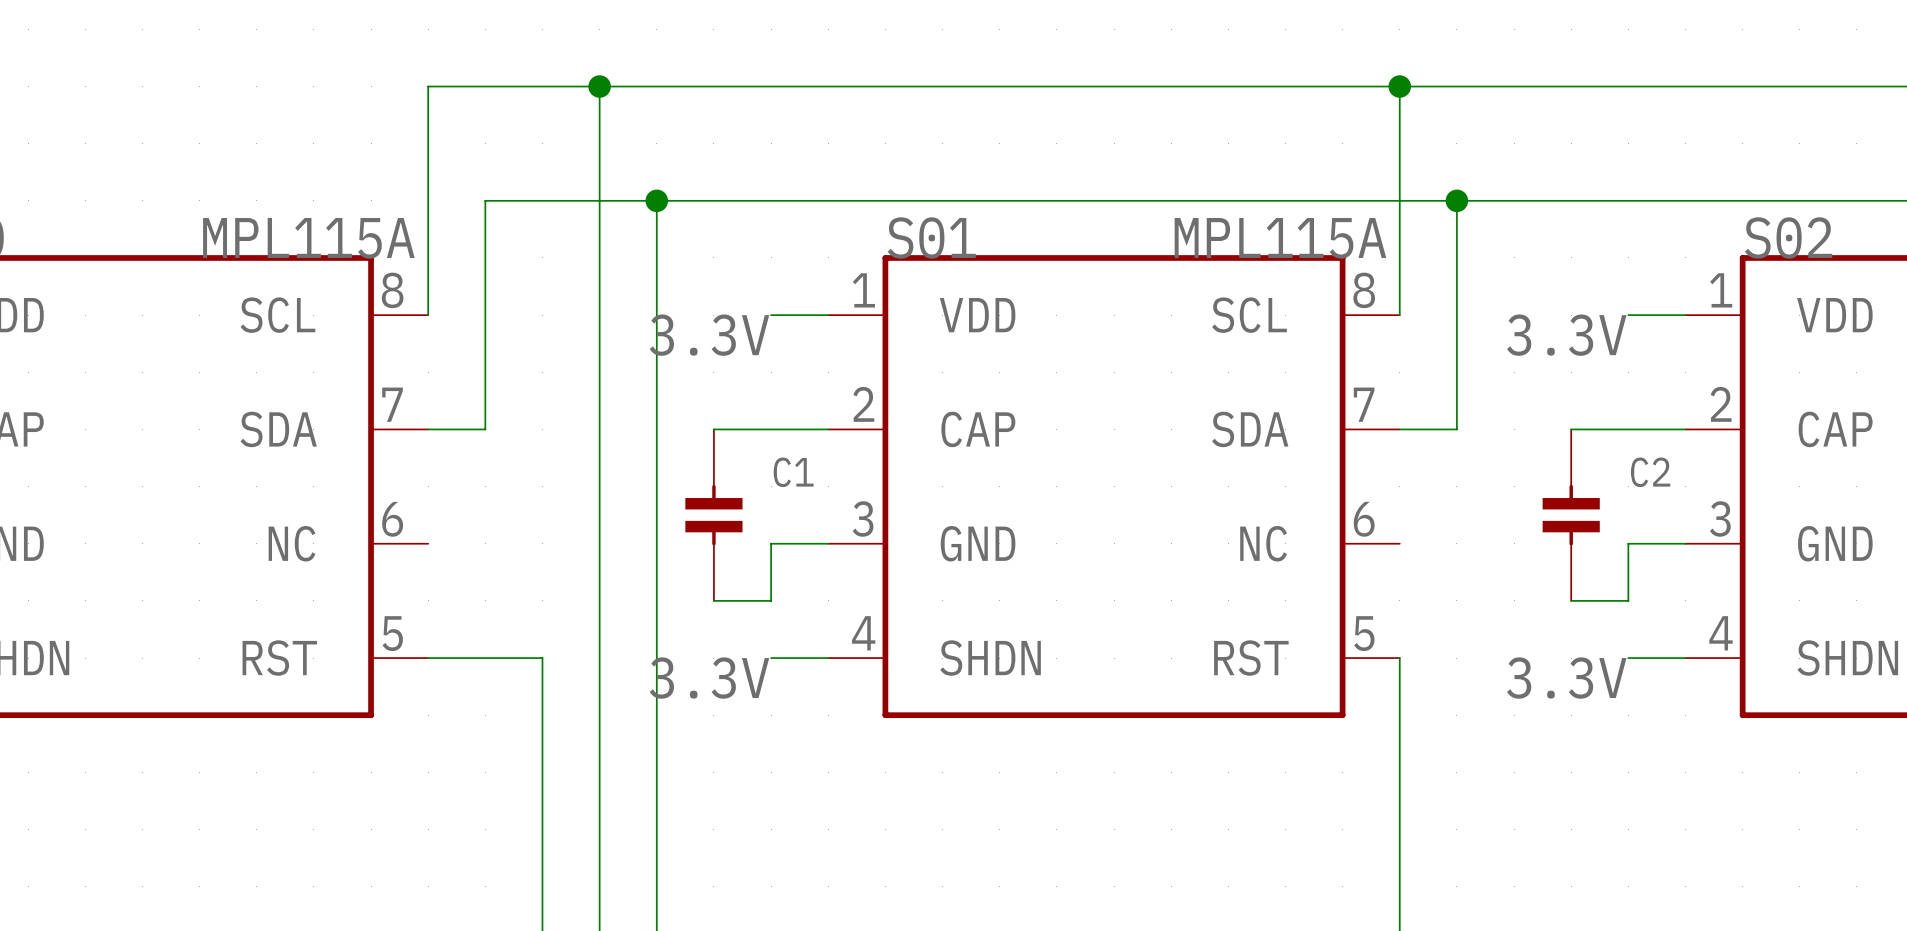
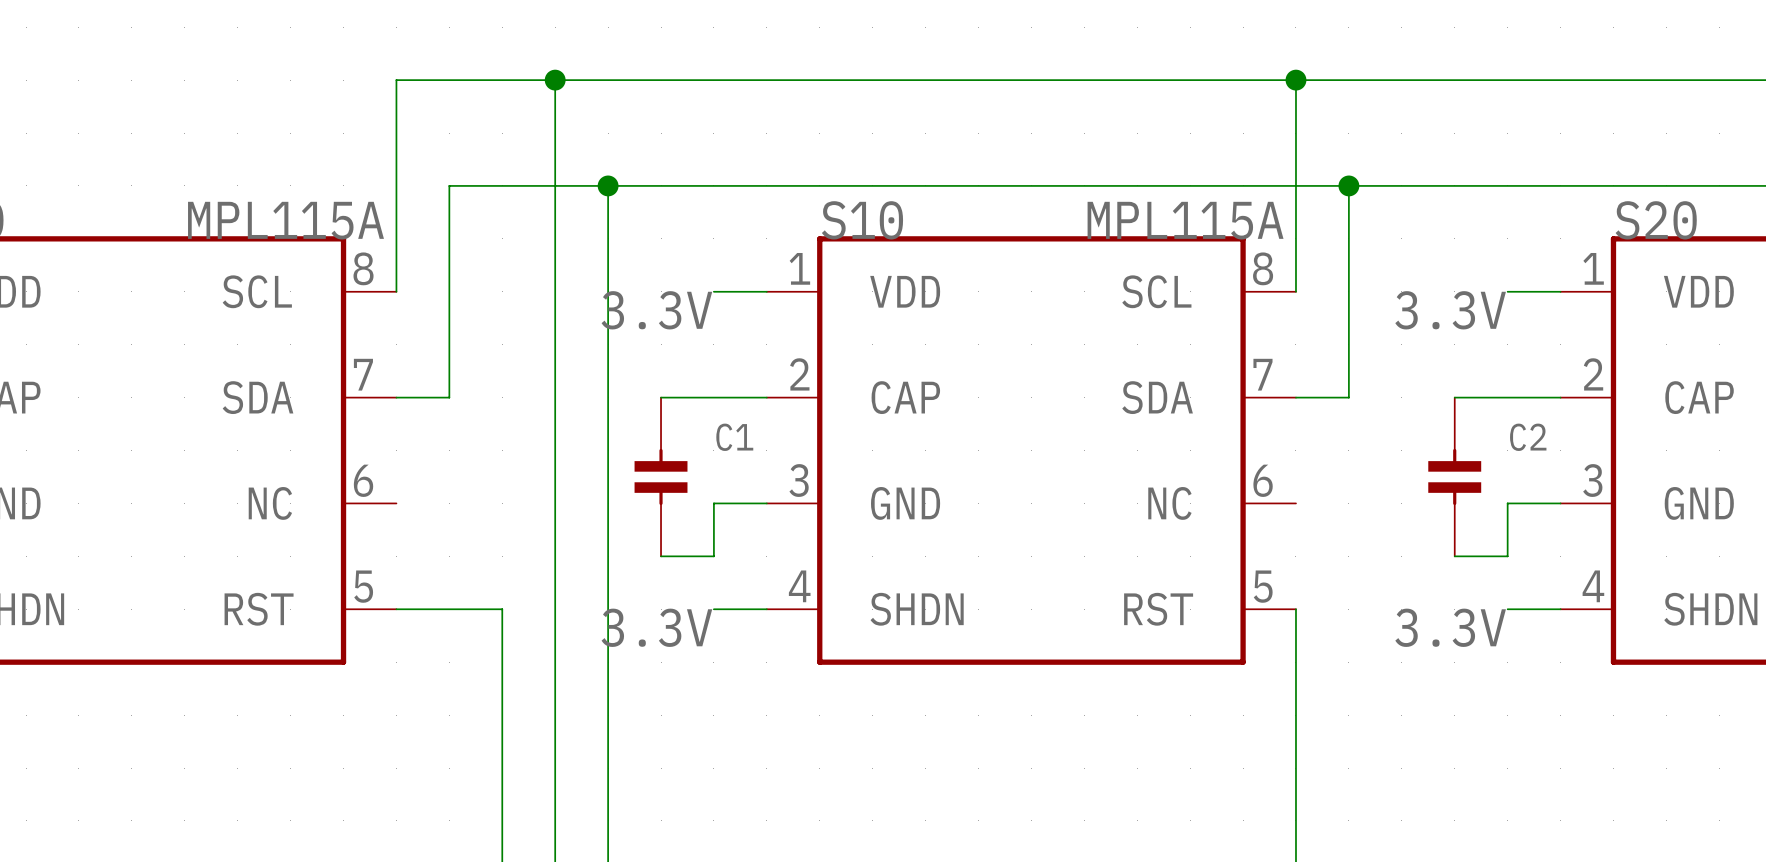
S01 name: S01 (931, 237) -> S10 (862, 220)
S02 name: S02 (1788, 237) -> S20 (1656, 220)

